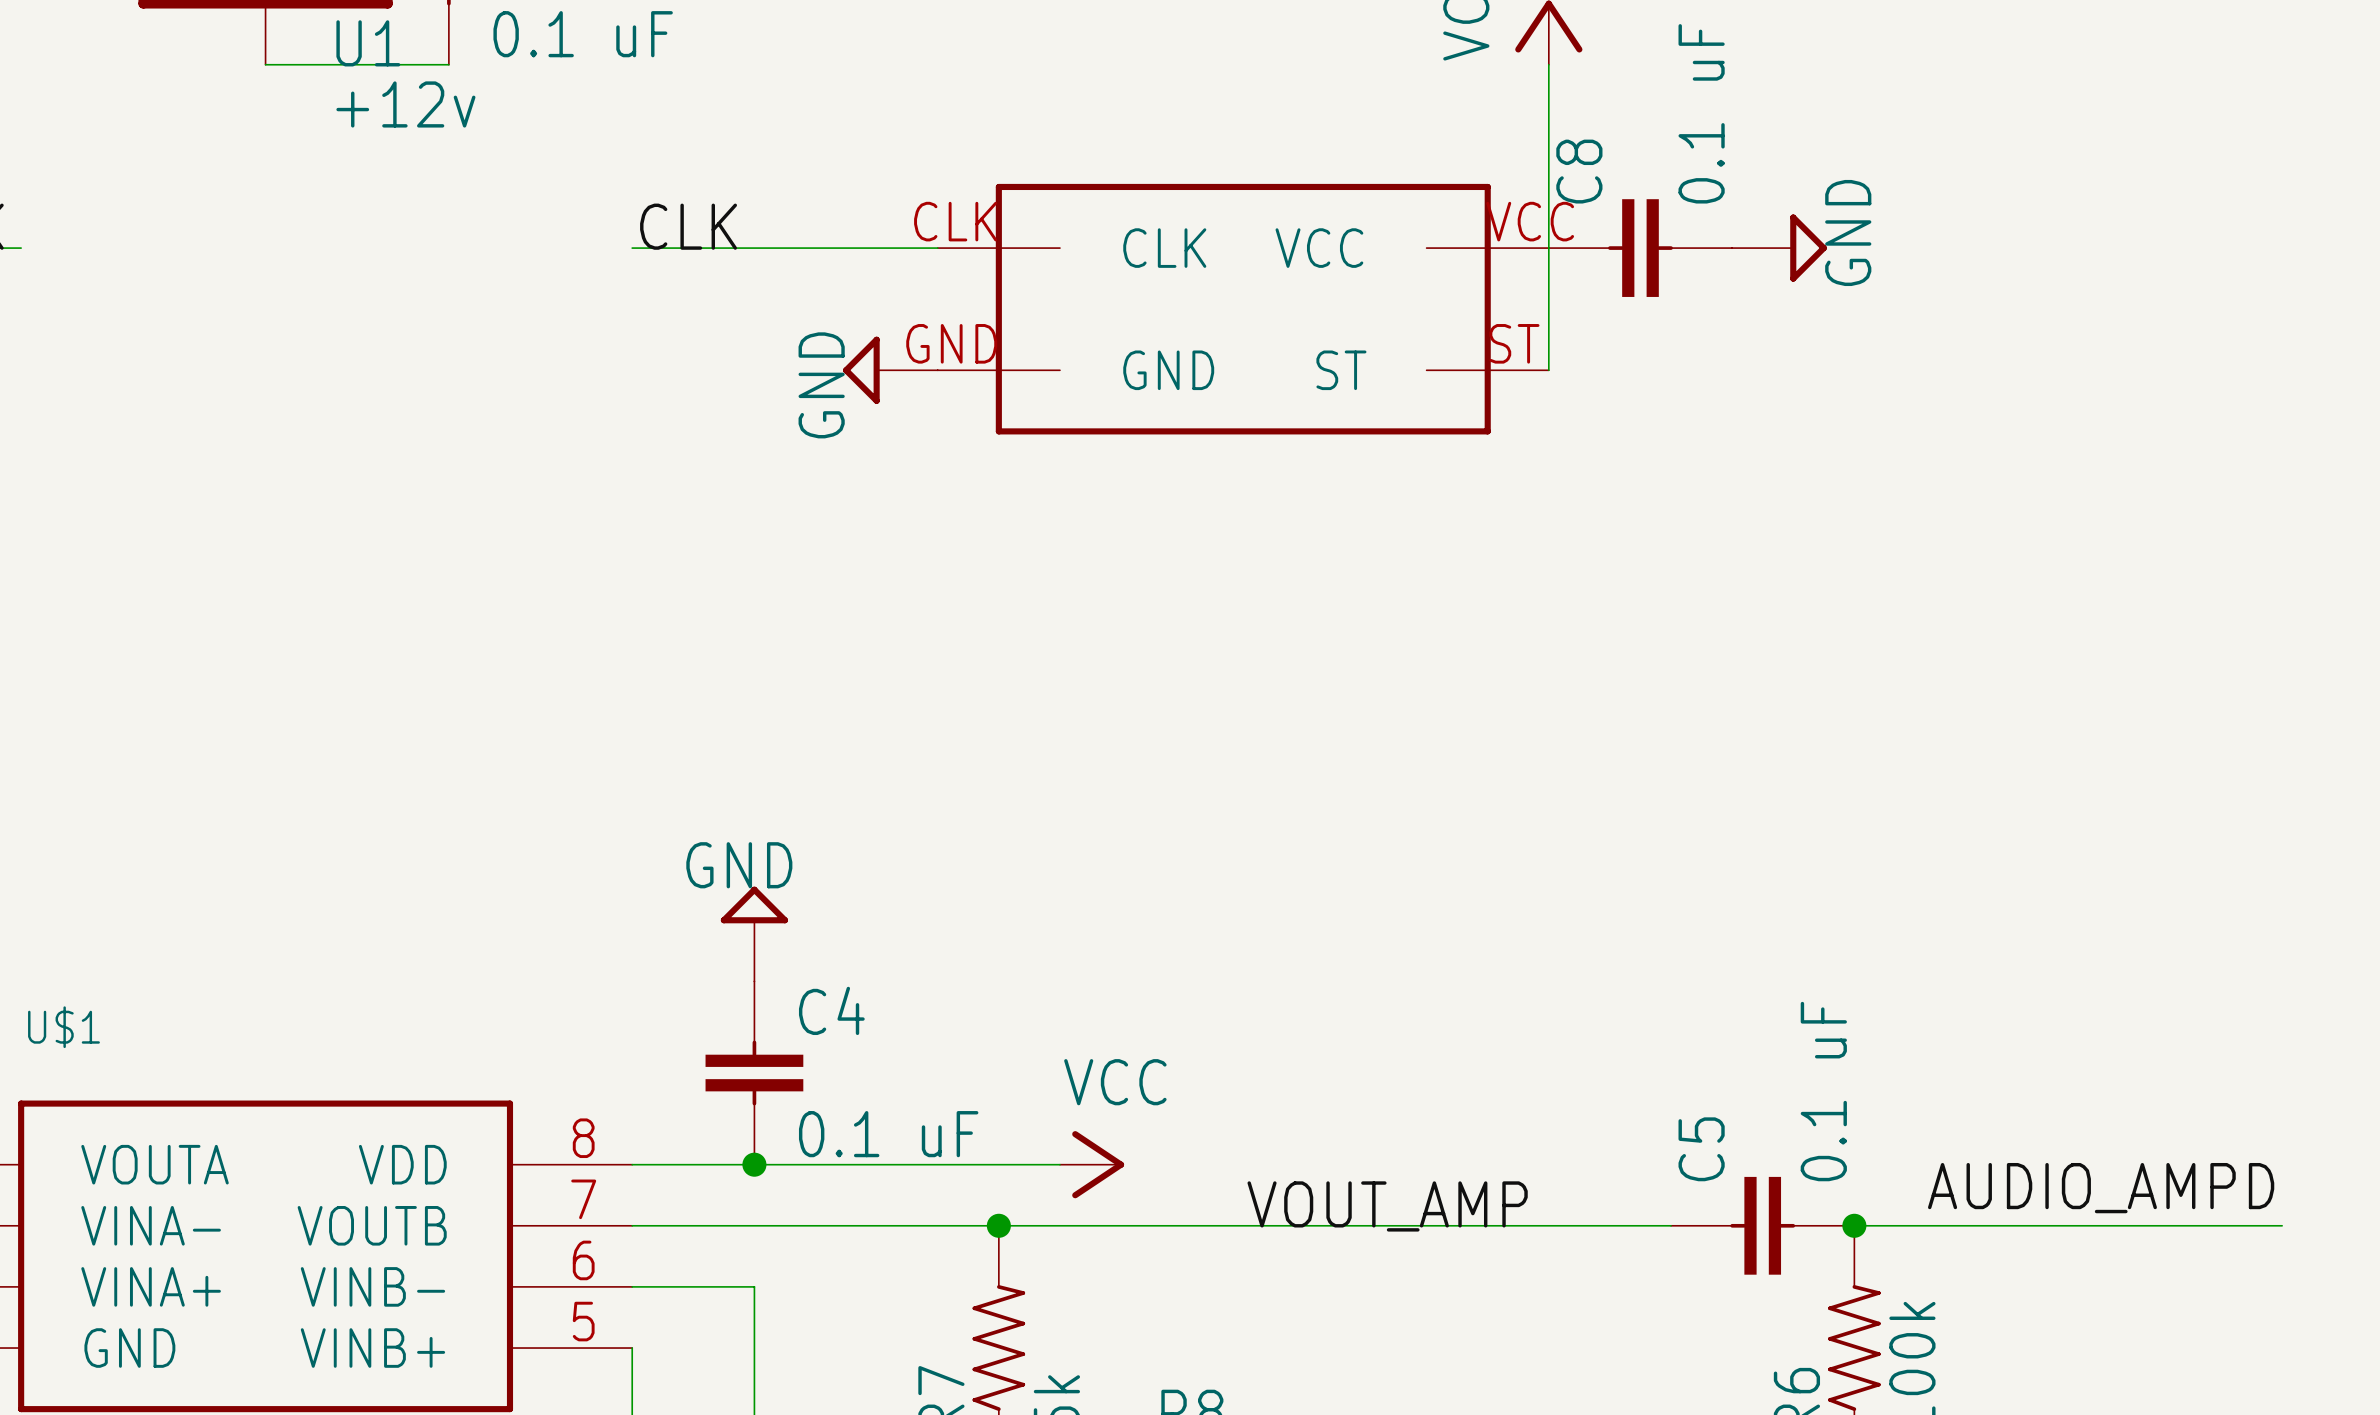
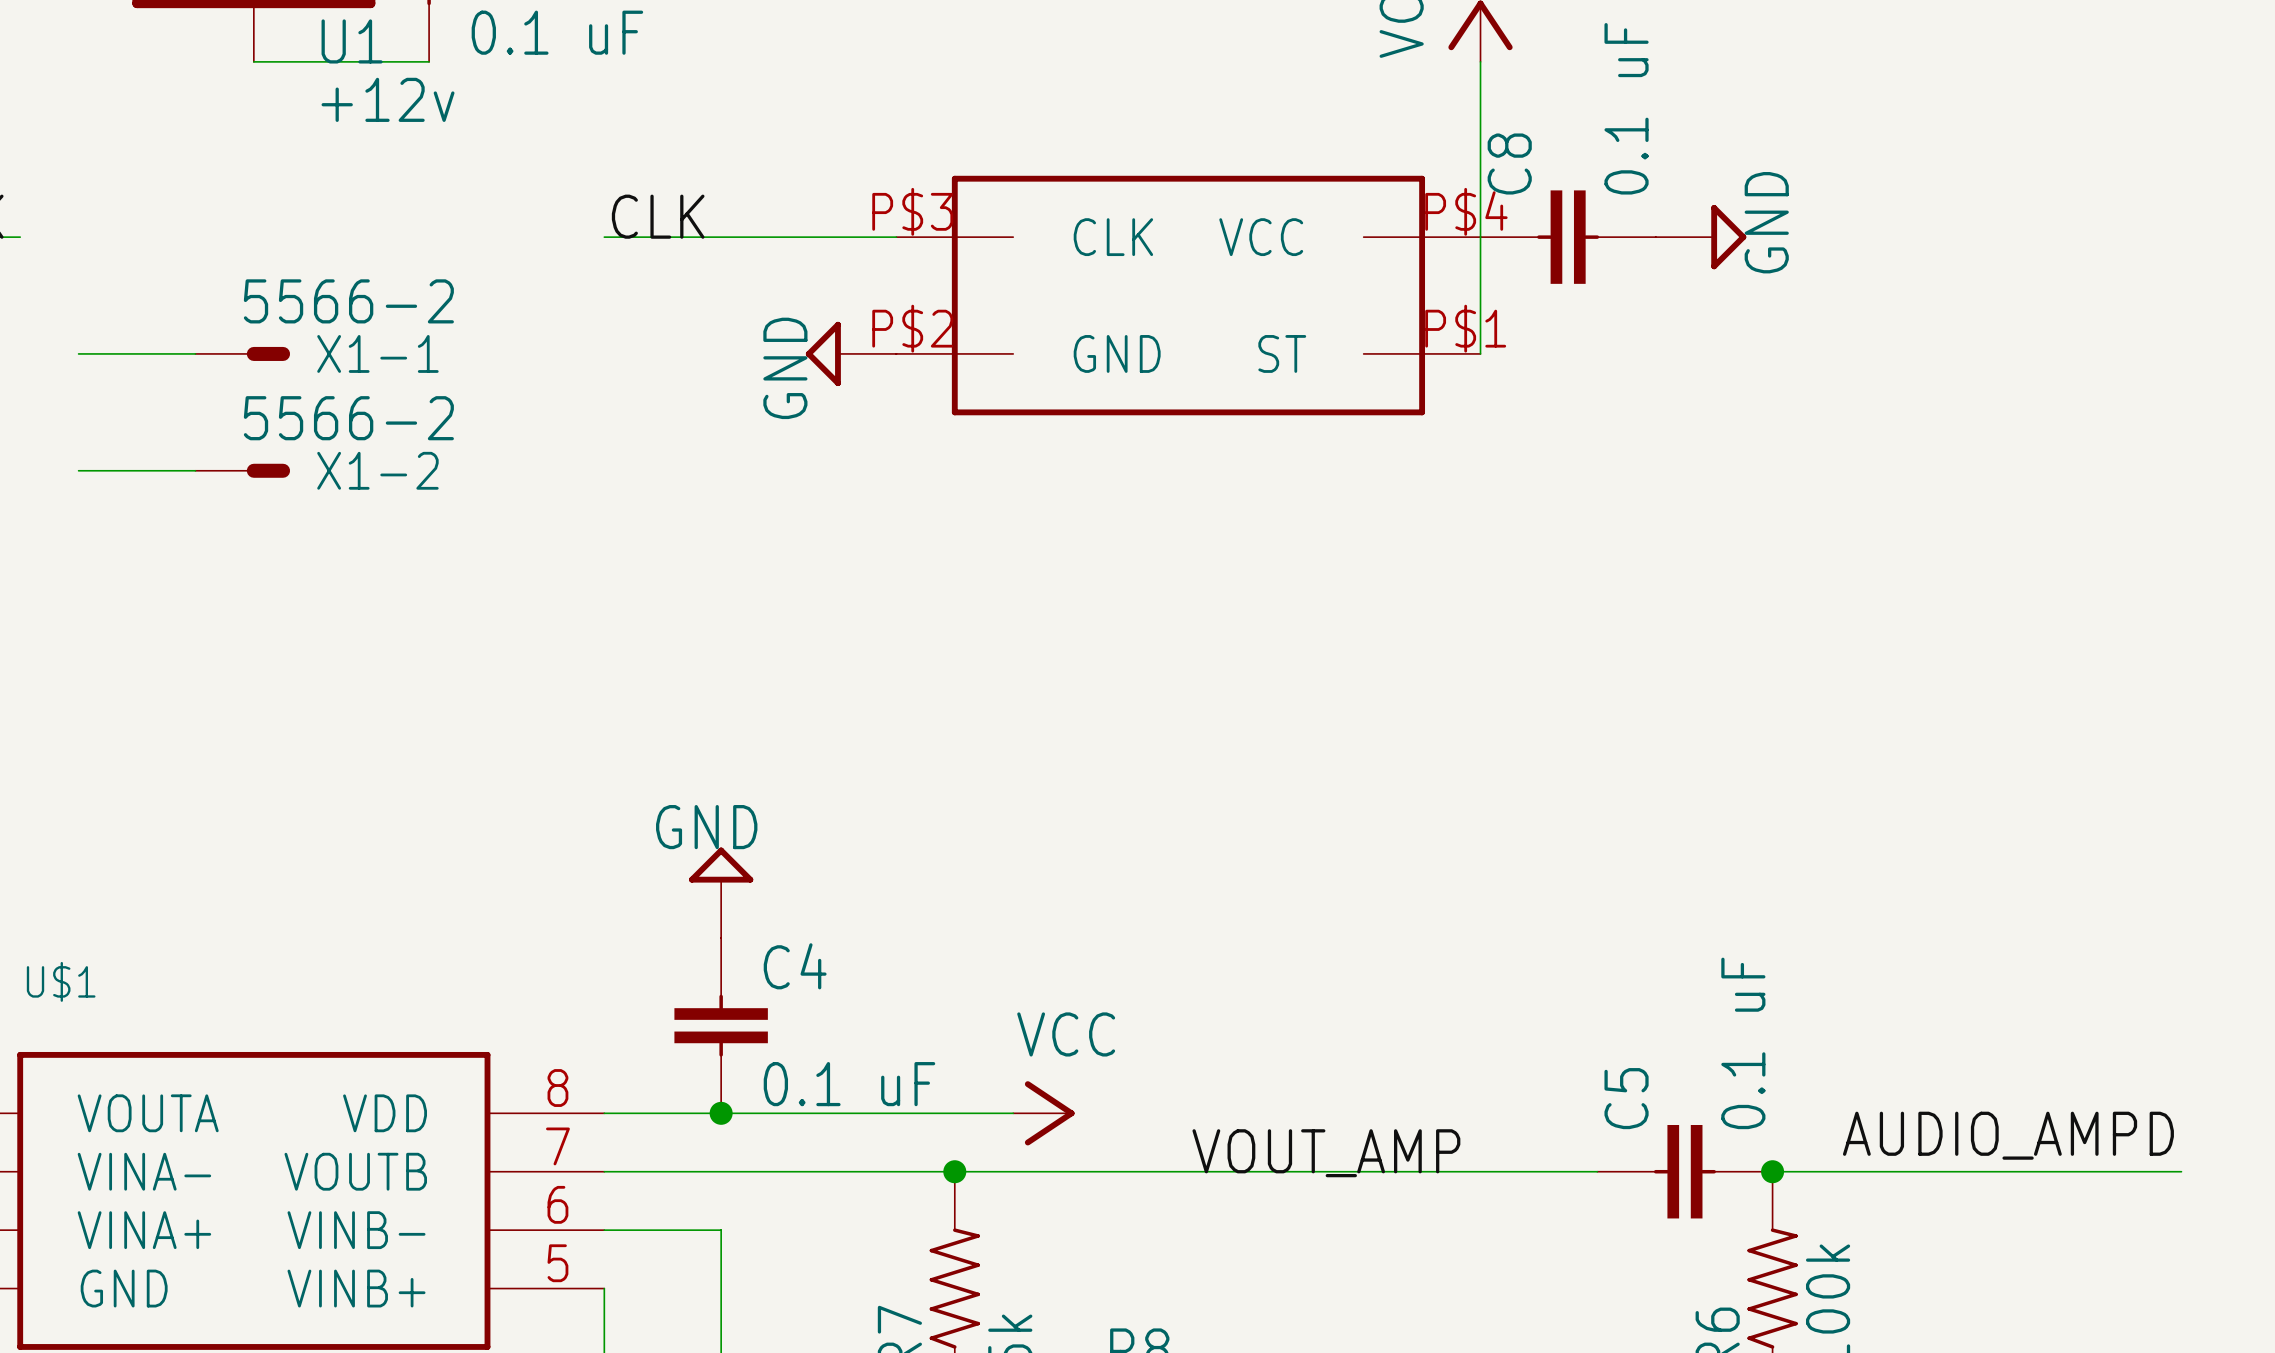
part pin number: CLK (955, 221) -> P$3 (912, 211)
part pin number: VCC (1530, 221) -> P$4 (1466, 211)
part pin number: GND (951, 343) -> P$2 (912, 328)
part pin number: ST (1514, 343) -> P$1 (1465, 328)
wire: none -> (78, 353) (195, 353)
X1-1: none -> 5566-2 (242, 353)
wire: none -> (78, 470) (195, 470)
X1-2: none -> 5566-2 (242, 470)

